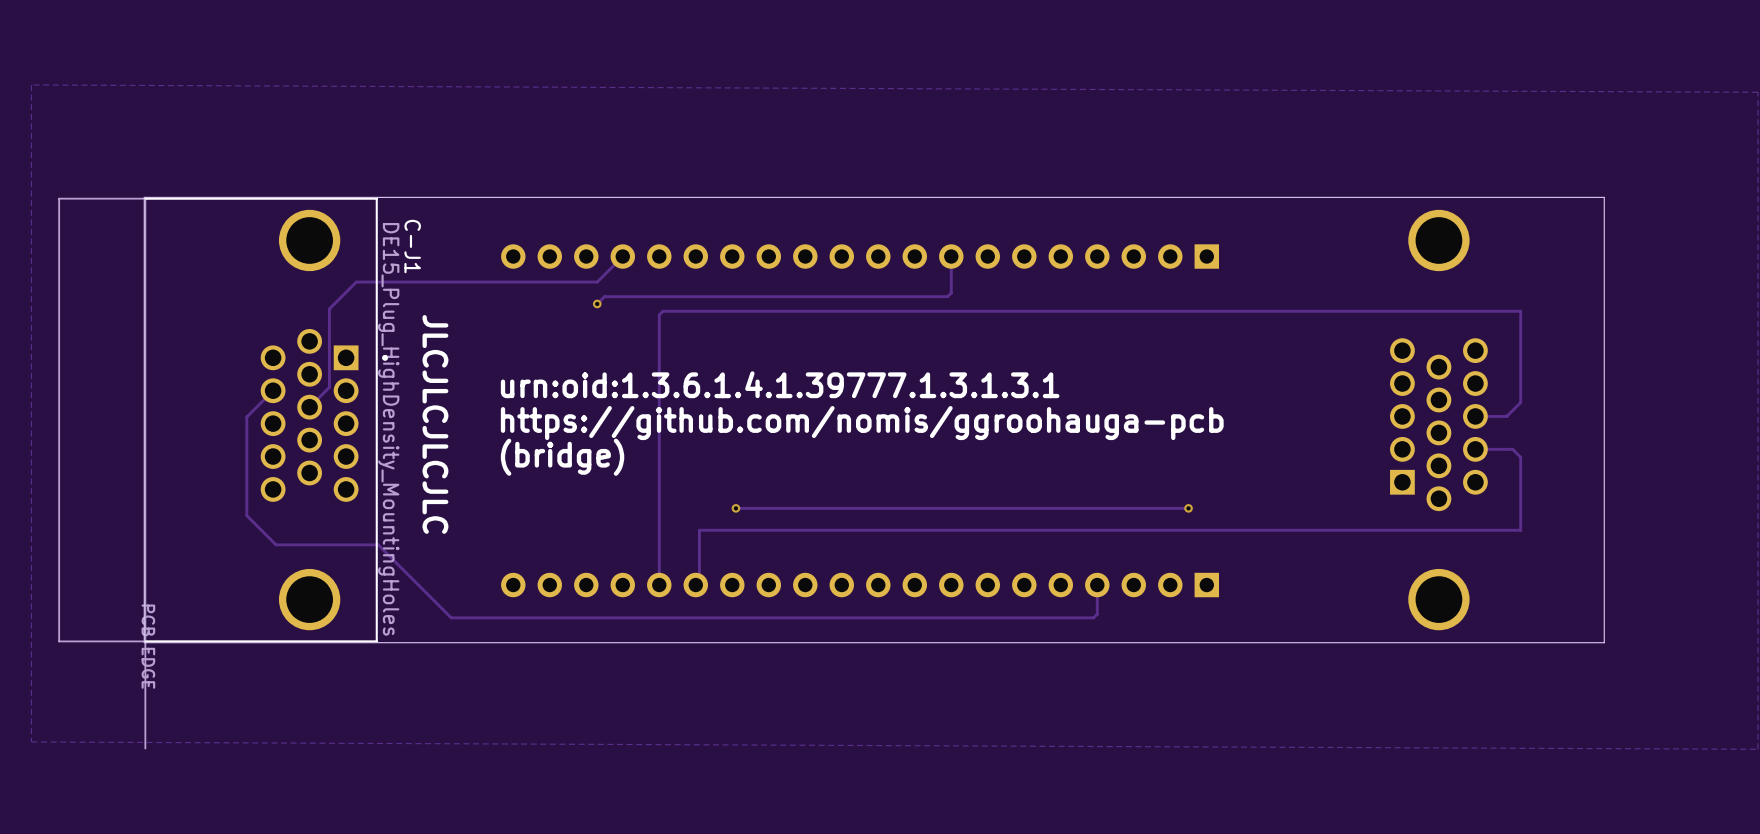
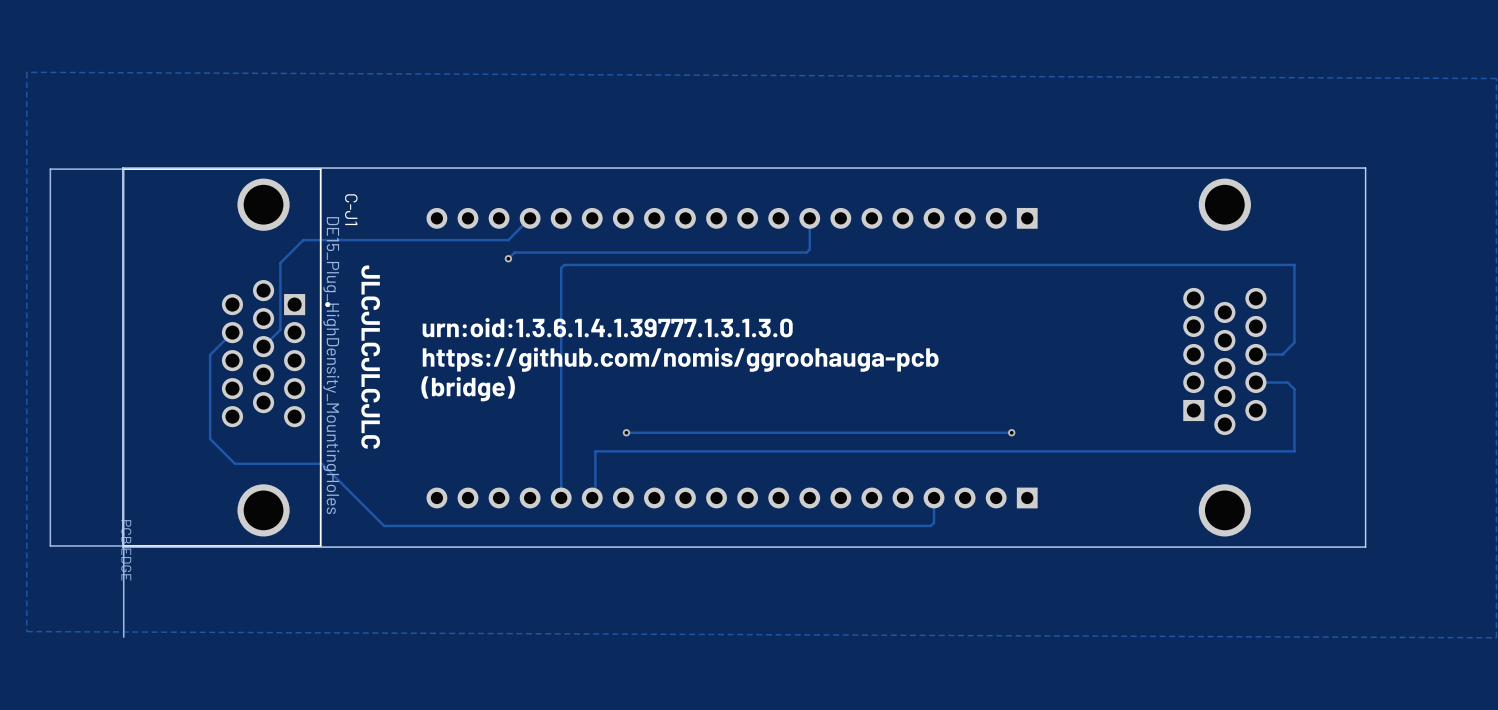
text: urn:oid:1.3.6.1.4.1.39777.1.3.1.3.1 (780, 384) -> urn:oid:1.3.6.1.4.1.39777.1.3.1.3.0 (607, 327)

